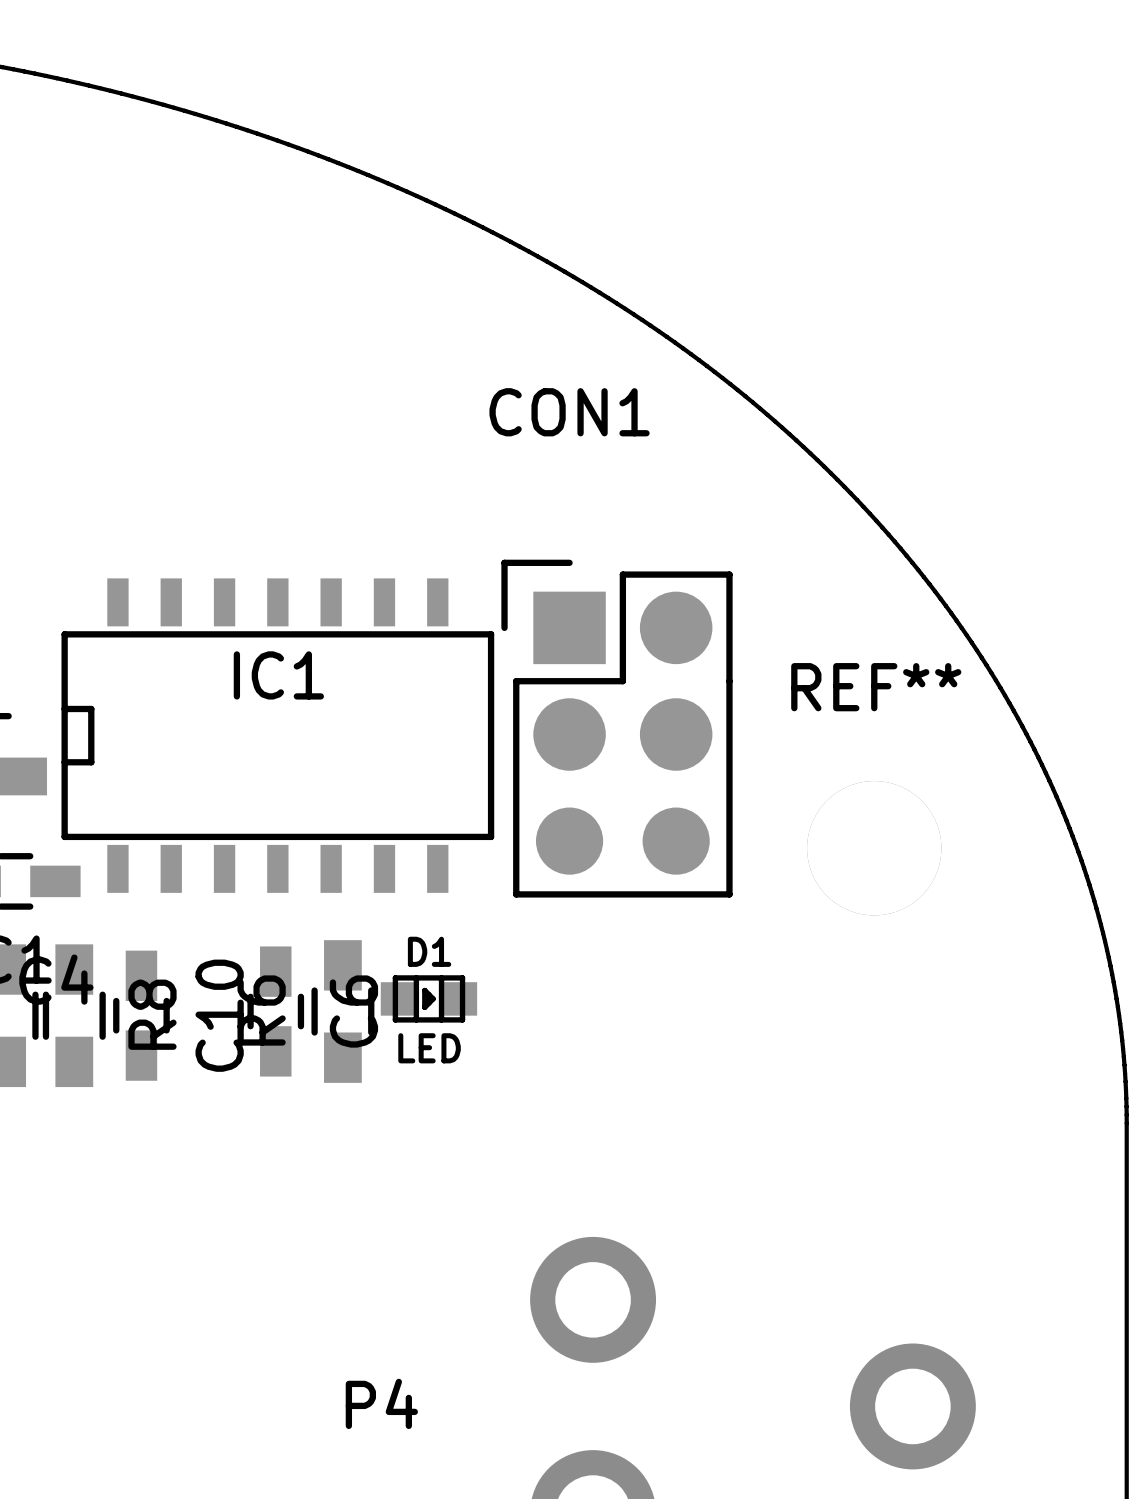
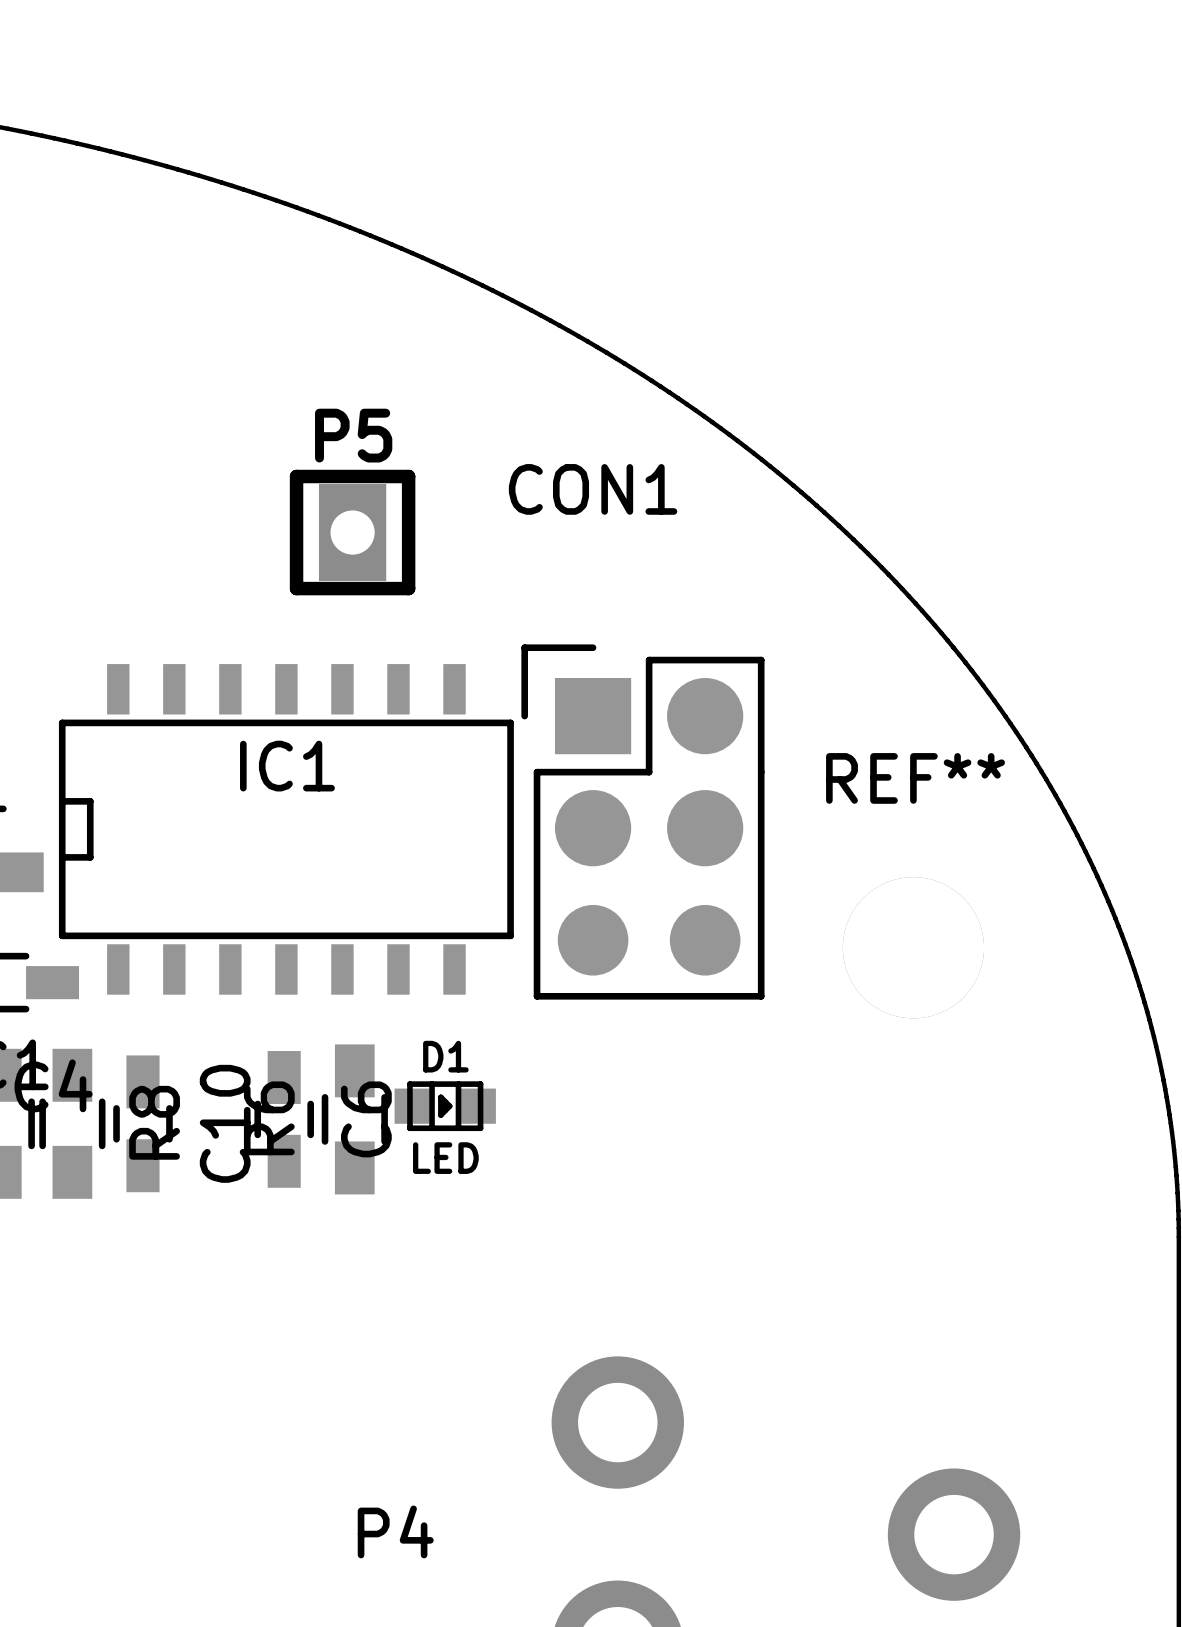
P5: none -> (352, 532)

